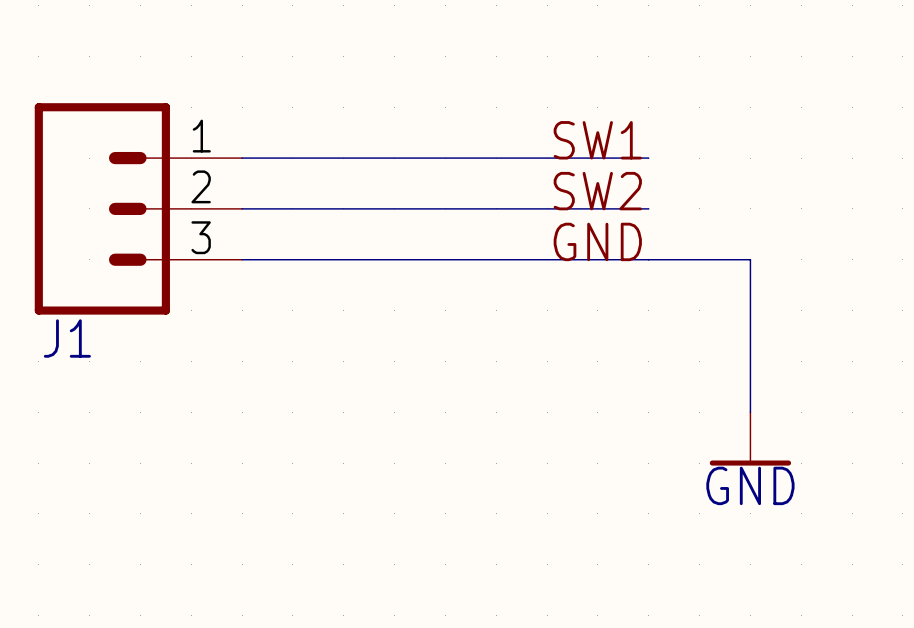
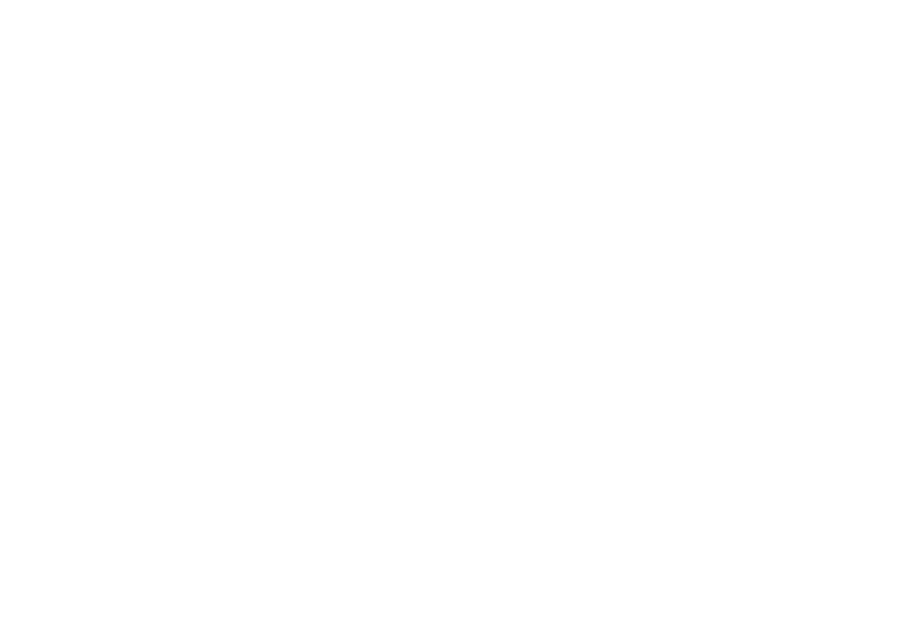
label: SW1 (597, 140) -> none
wire: (242, 158) (648, 158) -> none
label: SW2 (597, 191) -> none
J1: (138, 208) -> none
wire: (242, 208) (648, 208) -> none
label: GND (597, 241) -> none
wire: (242, 259) (750, 259) (750, 412) -> none
power symbol: GND (750, 438) -> none

